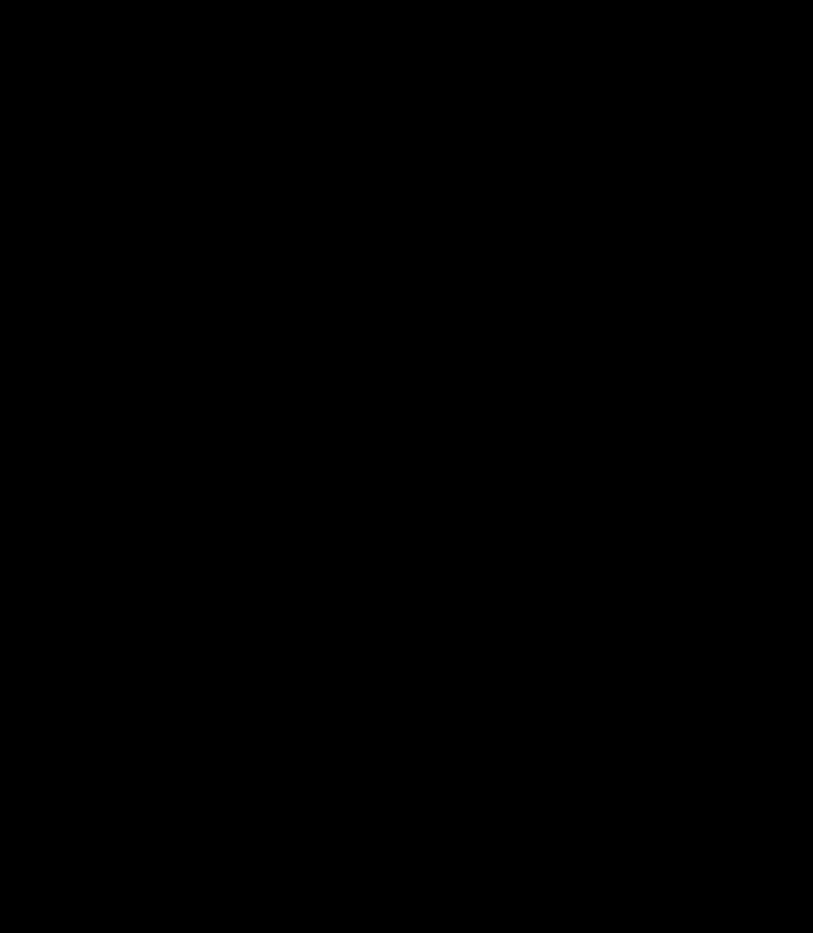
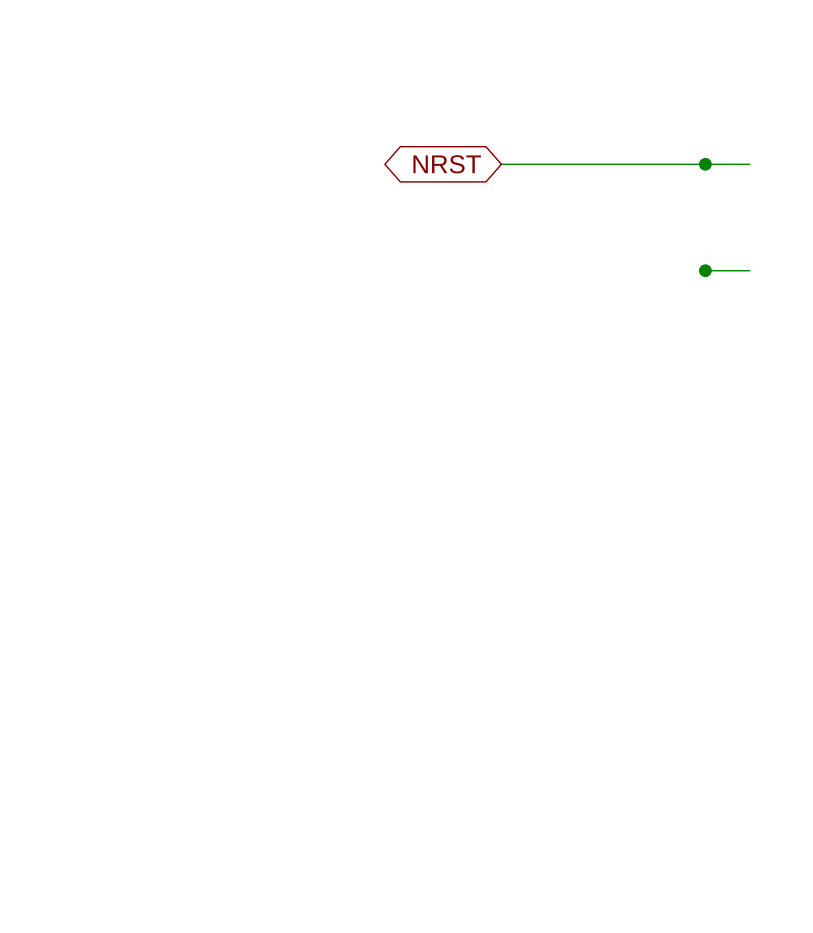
global label: none -> NRST (447, 164)
wire: none -> (501, 164) (749, 164)
junction: none -> (705, 164)
wire: none -> (705, 270) (749, 270)
junction: none -> (705, 270)

